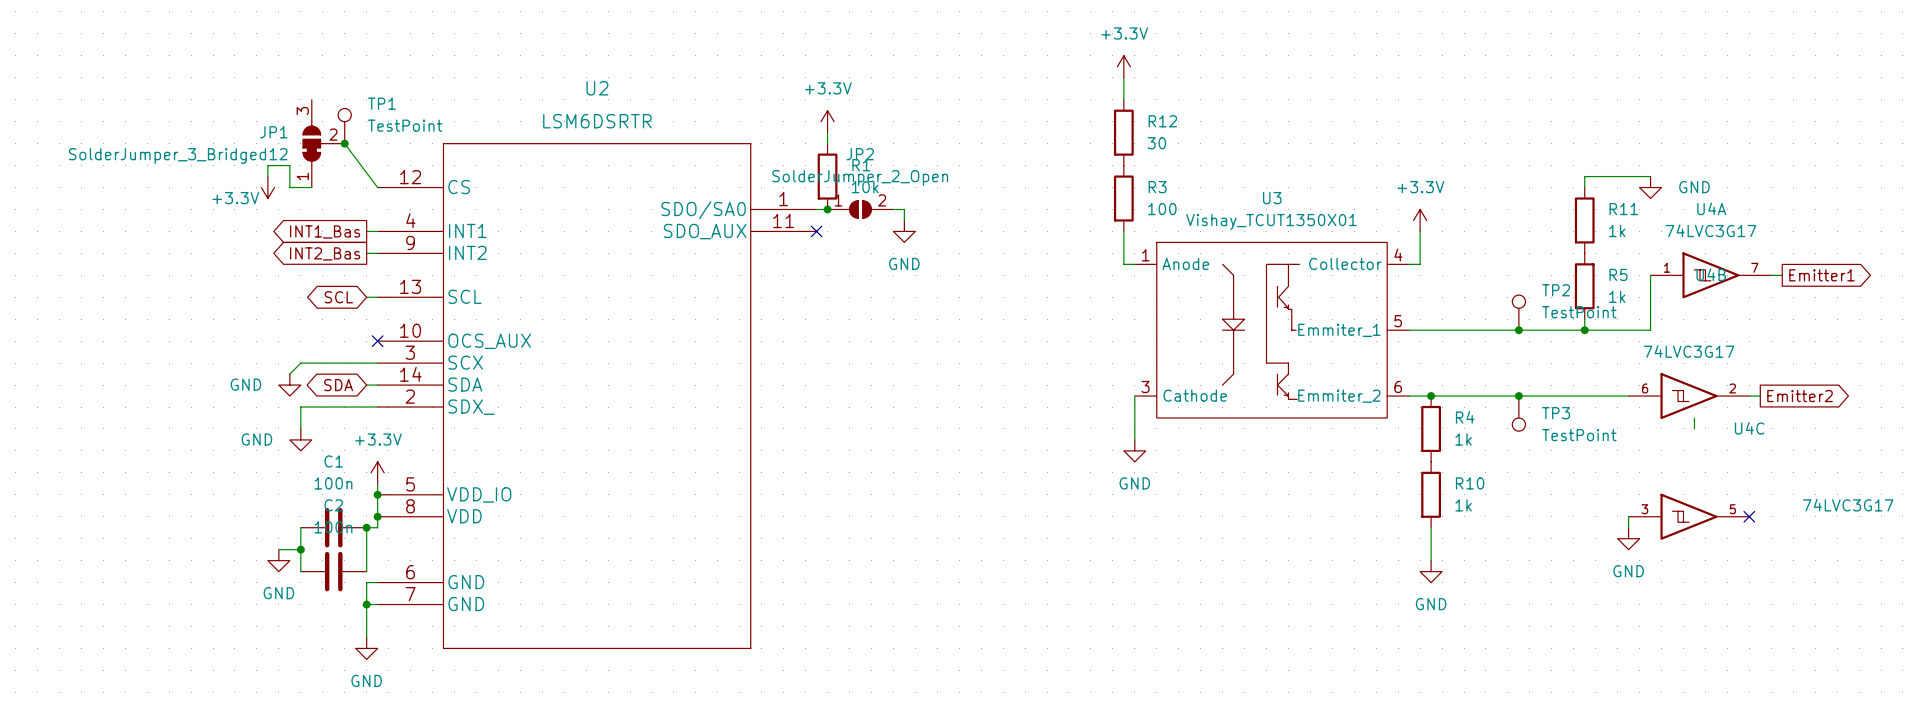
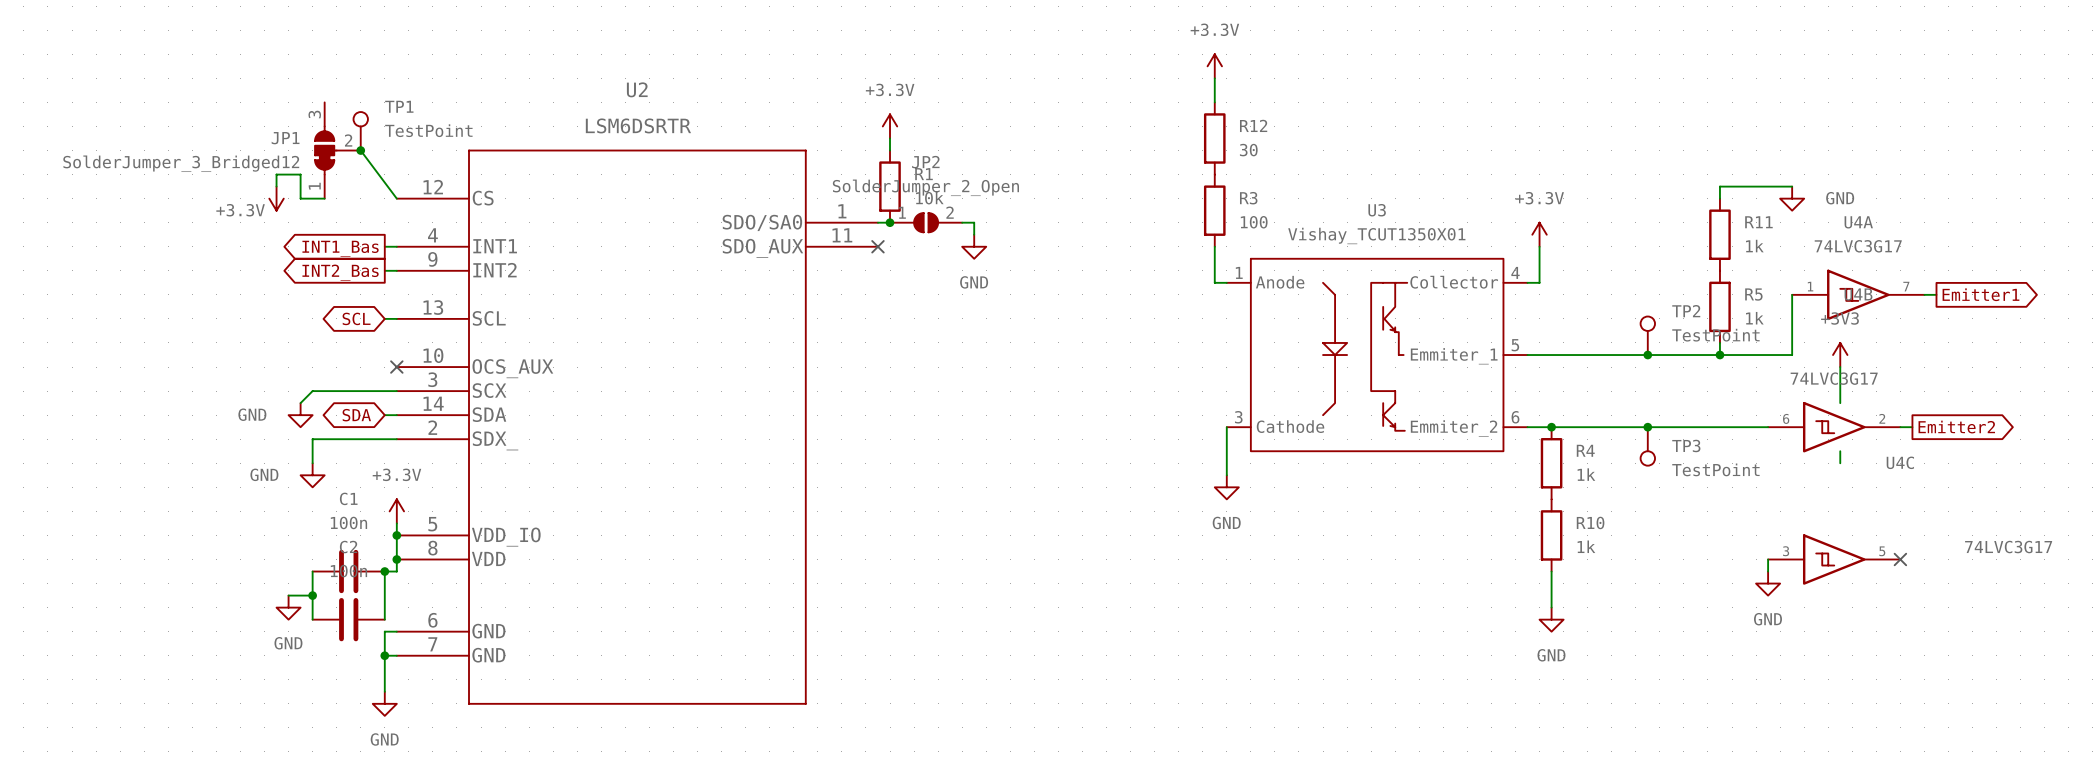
power symbol: none -> +3V3 (1840, 355)
wire: none -> (1840, 367) (1840, 403)

